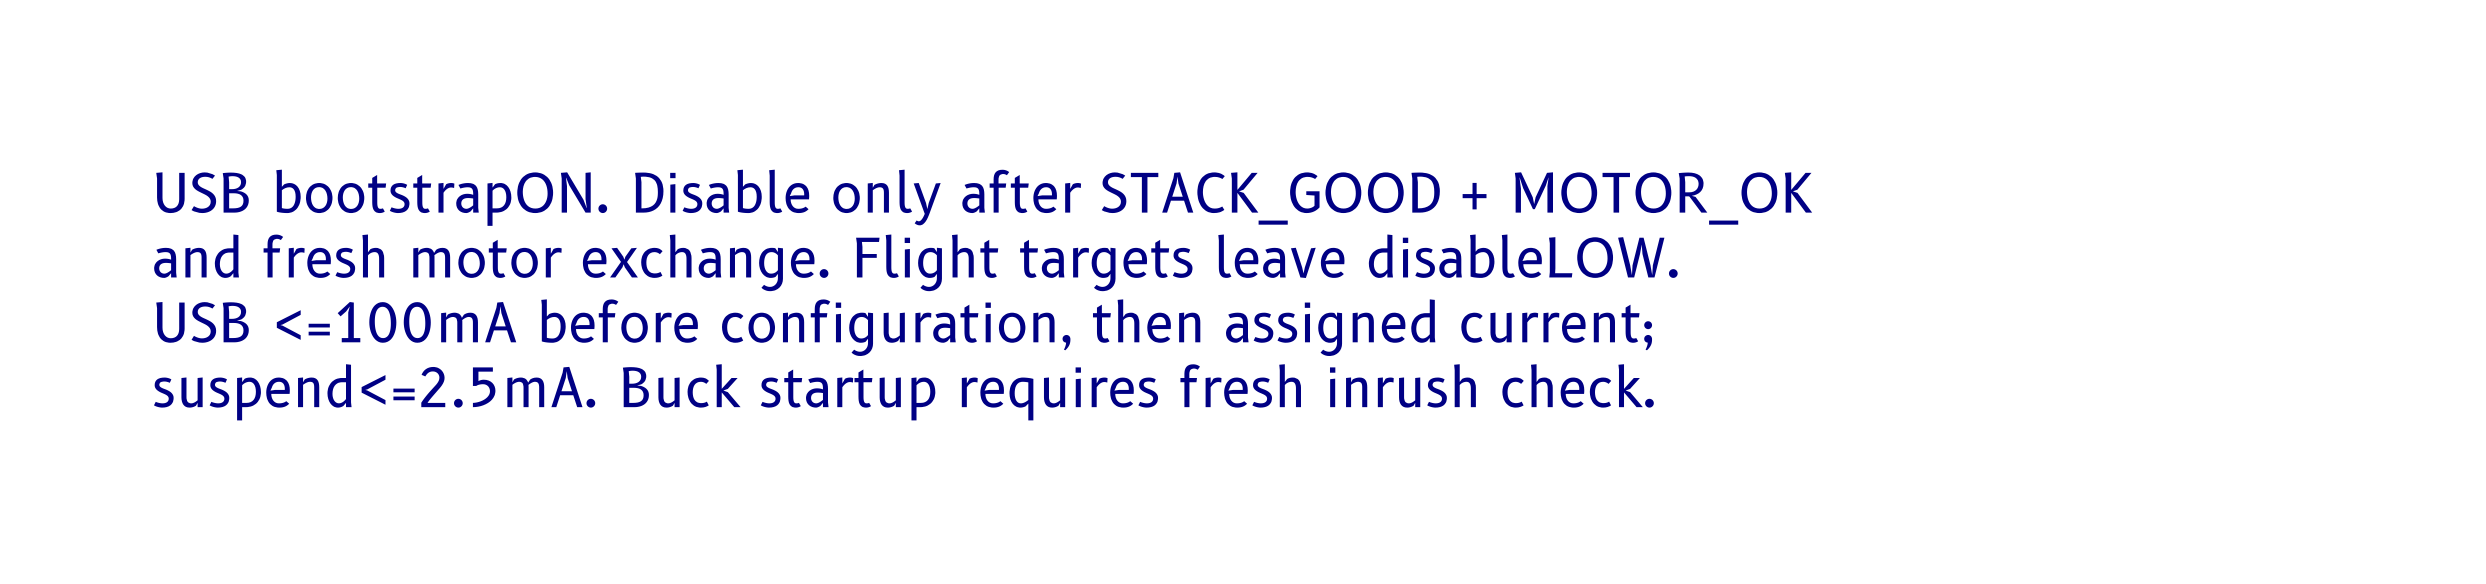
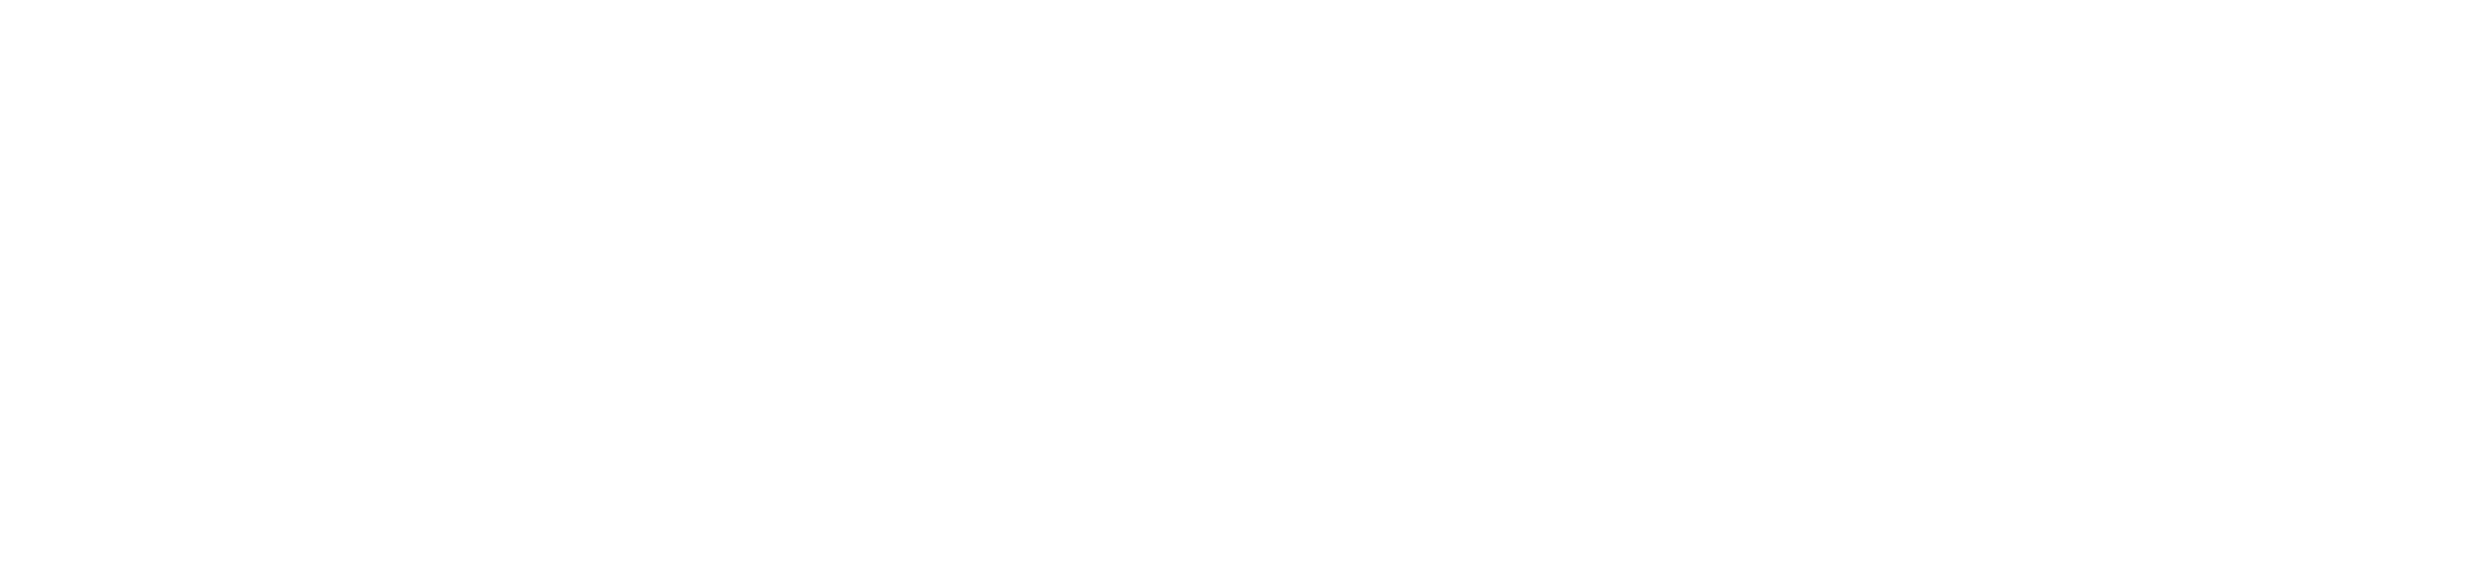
text: USB bootstrapON. Disable only after STACK_GOOD + MOTOR_OK (984, 197) -> none
text: and fresh motor exchange. Flight targets leave disableLOW. (915, 262) -> none
text: USB <=100mA before configuration, then assigned current; (904, 327) -> none
text: suspend<=2.5mA. Buck startup requires fresh inrush check. (903, 392) -> none

